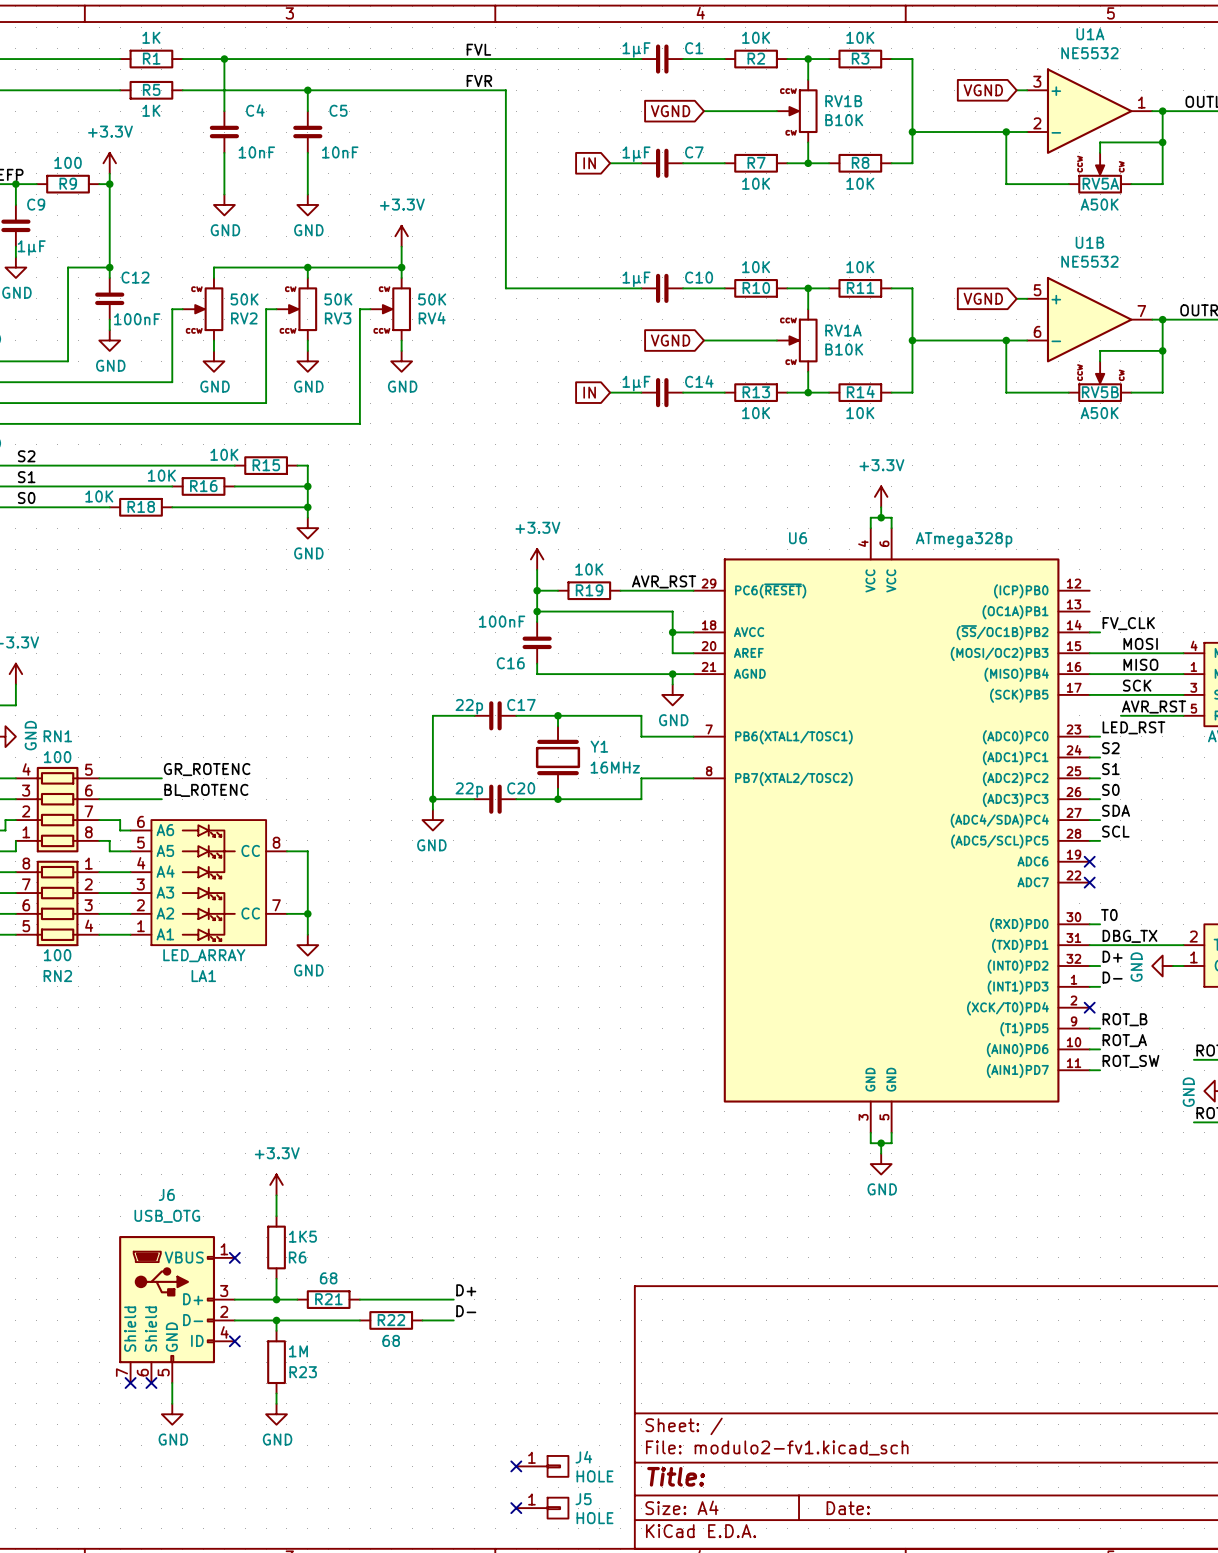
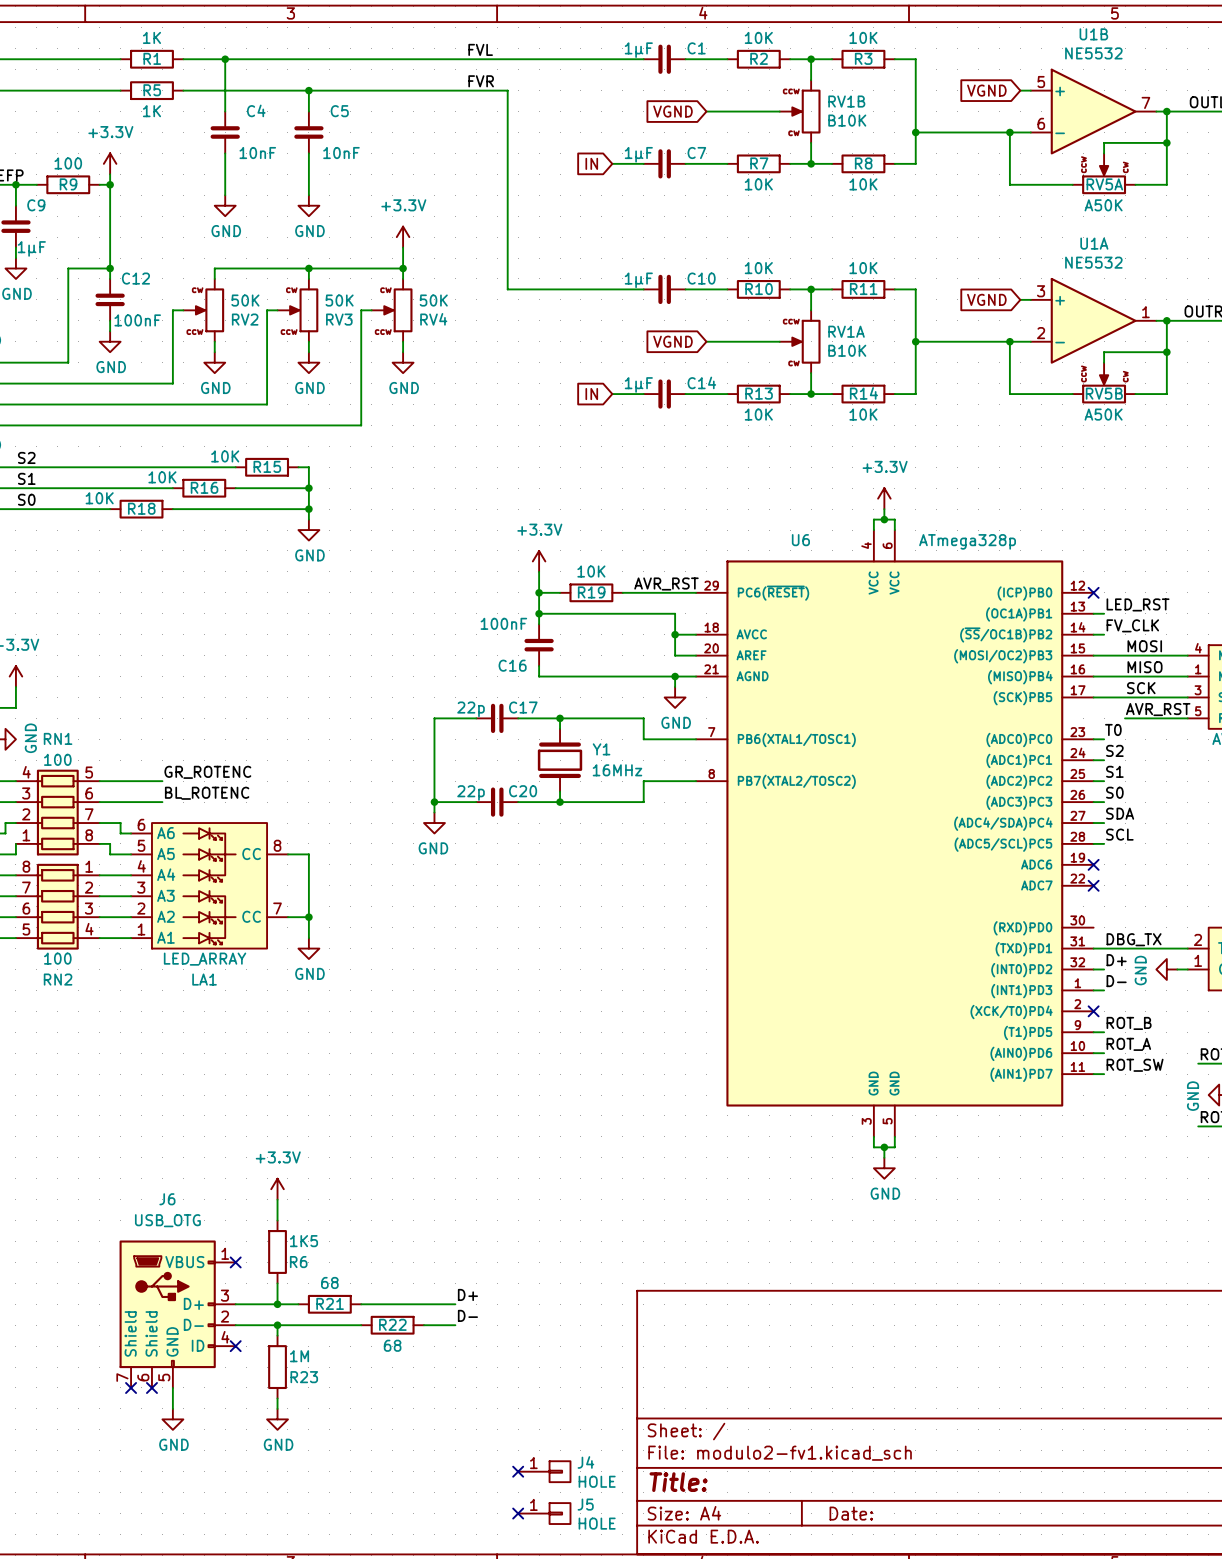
U1A position: (1089, 111) -> (1093, 320)
U1B position: (1089, 319) -> (1093, 111)
no-connect mark: none -> (1093, 592)
label: none -> LED_RST (1138, 604)
wire: none -> (1093, 613) (1104, 613)
label: LED_RST (1133, 727) -> T0 (1113, 729)
label: T0 (1109, 915) -> none
wire: (1089, 924) (1100, 924) -> none

